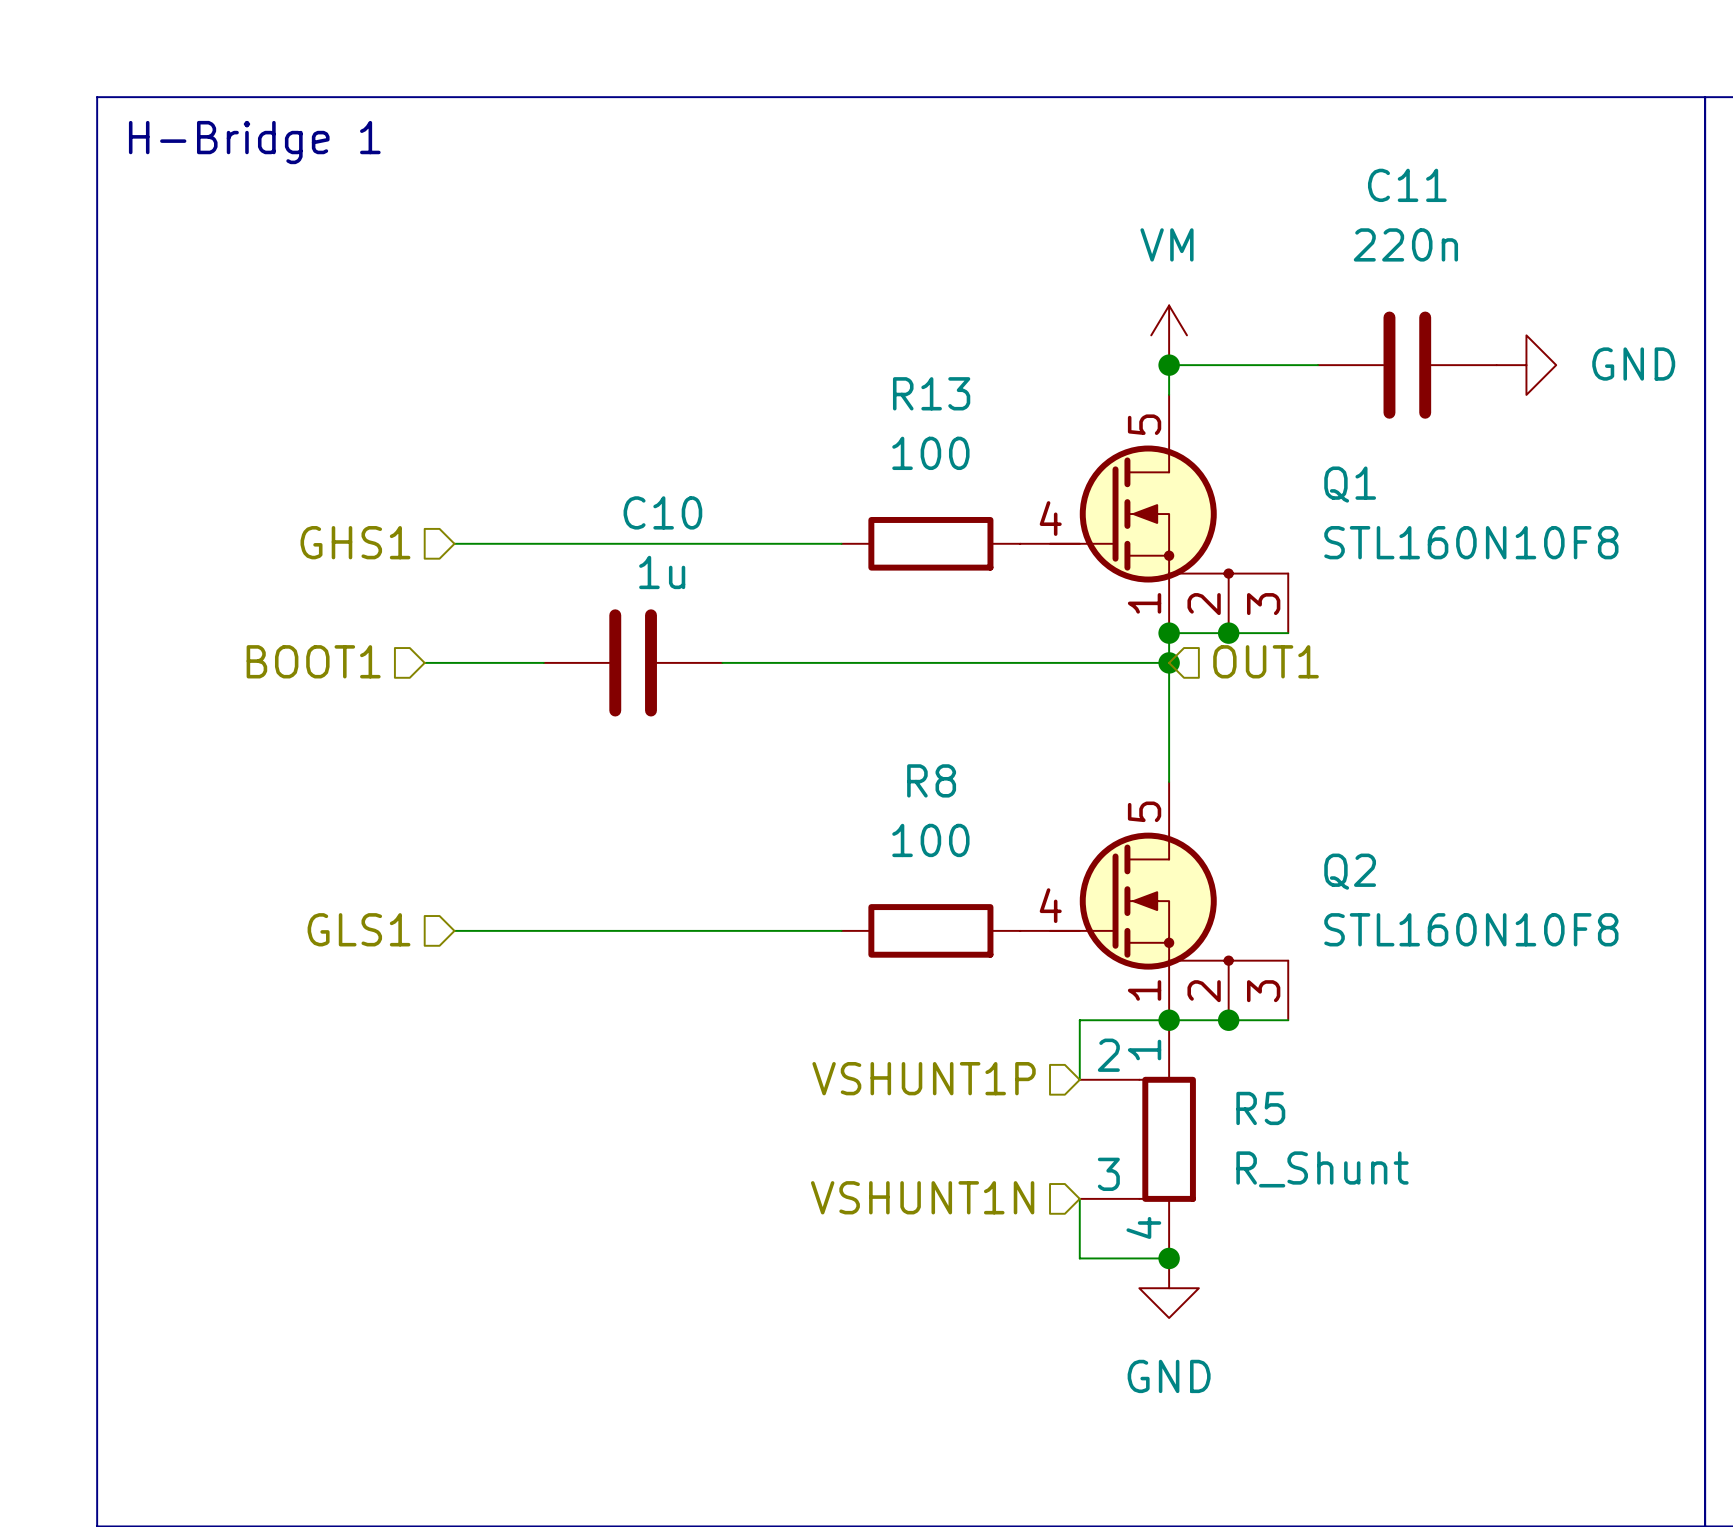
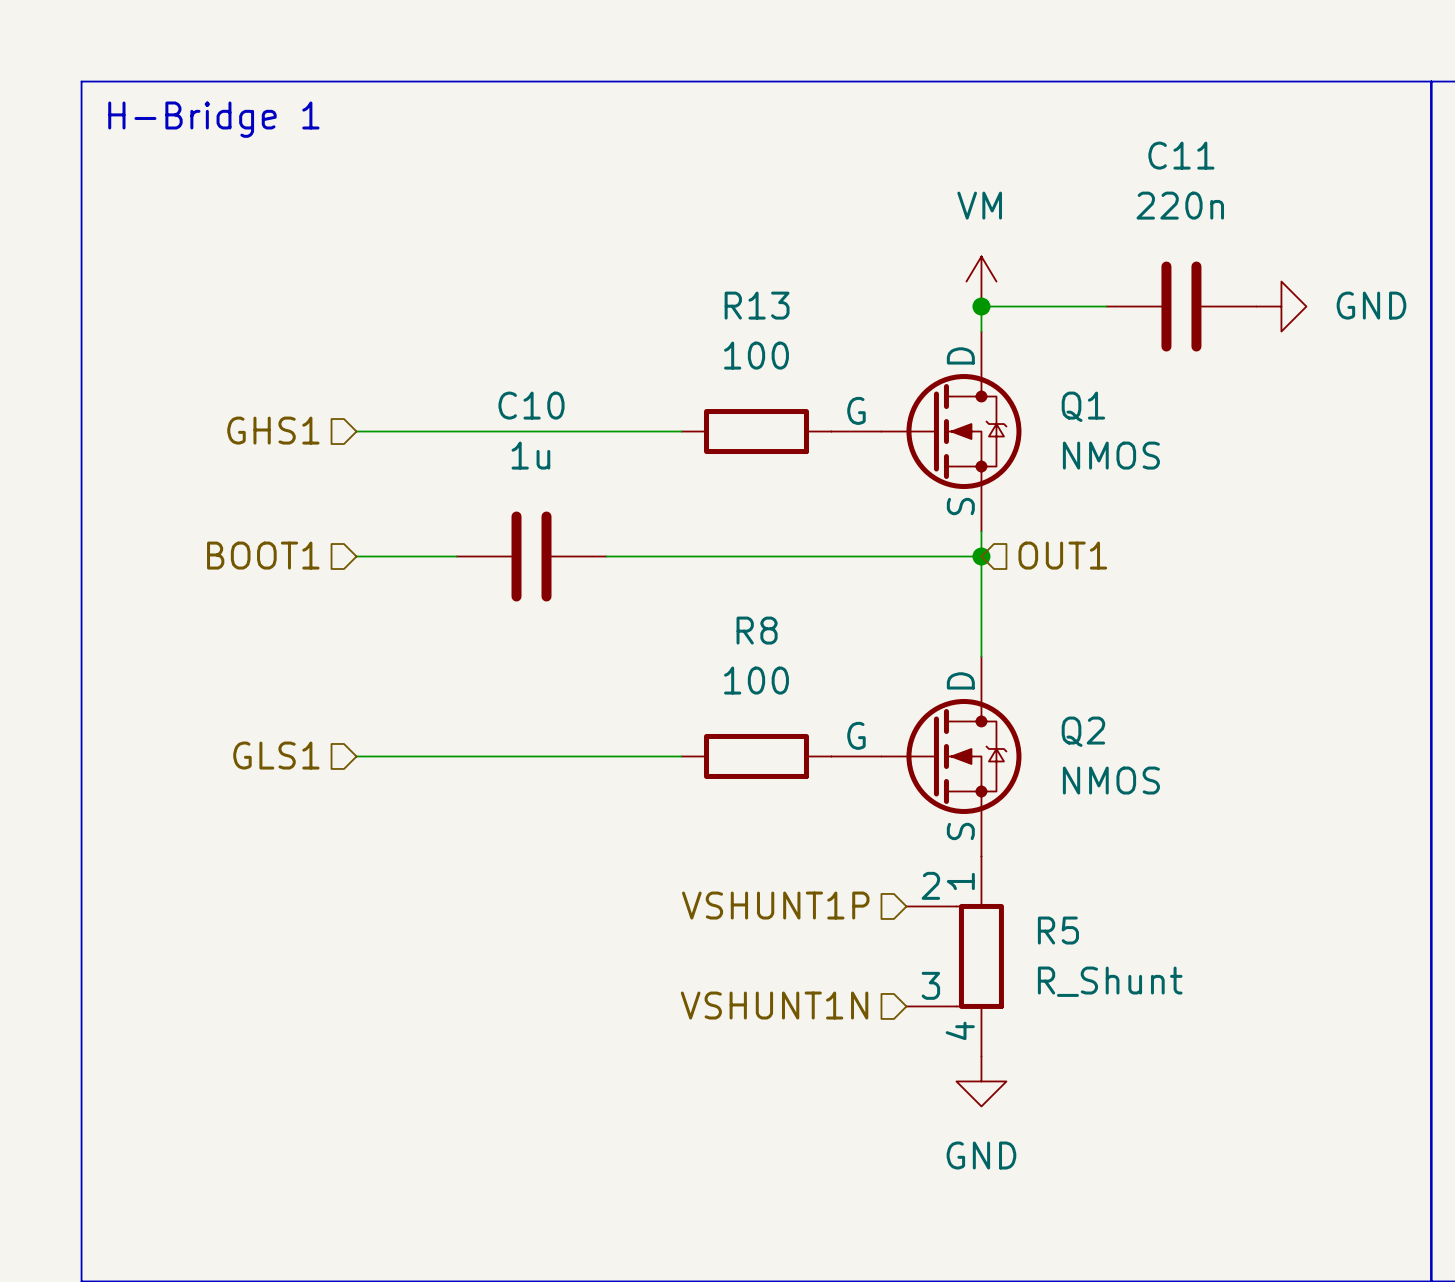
Q1 symbol: [1020, 394, 1289, 634] -> [831, 331, 1022, 532]
C10 name position: C10 (662, 512) -> C10 (531, 405)
hierarchical label position: GHS1 (355, 542) -> GHS1 (273, 430)
Q1 value: STL160N10F8 (1471, 542) -> NMOS (1111, 455)
wire: (454, 543) (841, 543) -> (356, 431) (681, 431)
R13 position: (930, 543) -> (756, 431)
C10 value position: 1u (662, 572) -> 1u (530, 455)
wire: (1169, 633) (1288, 633) -> none
junction: (1169, 633) -> none
junction: (1228, 633) -> none
Q2 symbol: [1020, 782, 1289, 1021] -> [831, 656, 1022, 857]
hierarchical label position: GLS1 (359, 929) -> GLS1 (276, 755)
Q2 value: STL160N10F8 (1471, 929) -> NMOS (1111, 780)
wire: (454, 930) (841, 930) -> (356, 756) (681, 756)
R8 position: (930, 930) -> (756, 756)
junction: (1169, 1020) -> none
junction: (1228, 1020) -> none
wire: (1288, 1020) (1079, 1020) (1079, 1079) -> none
wire: (1079, 1198) (1079, 1258) (1169, 1258) -> none
junction: (1169, 1258) -> none

